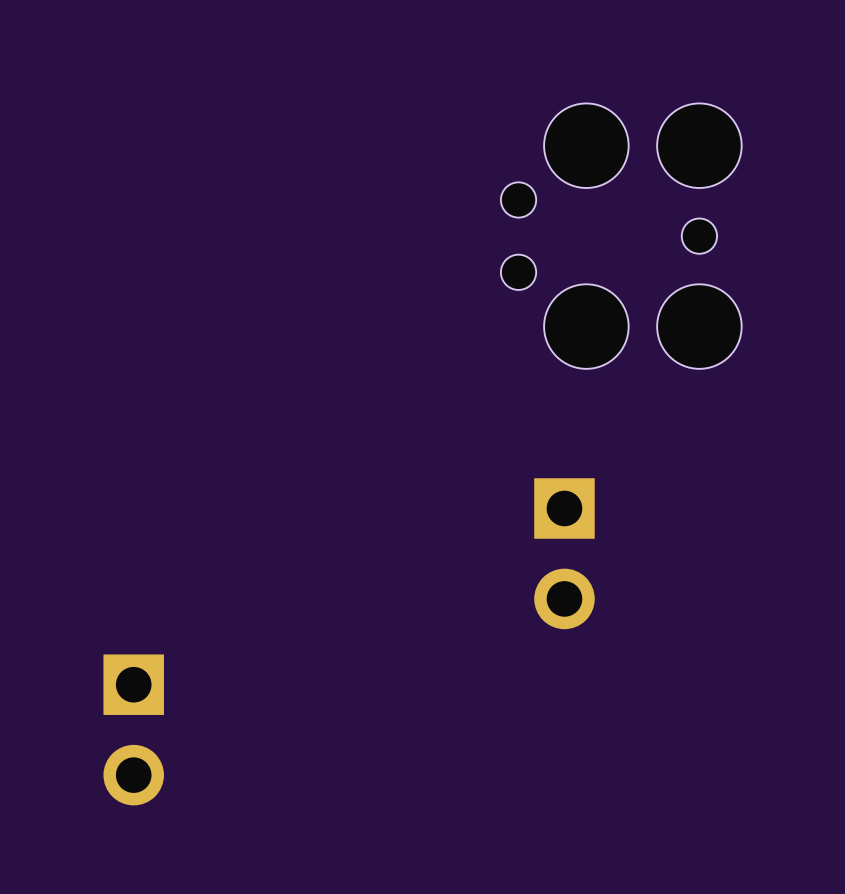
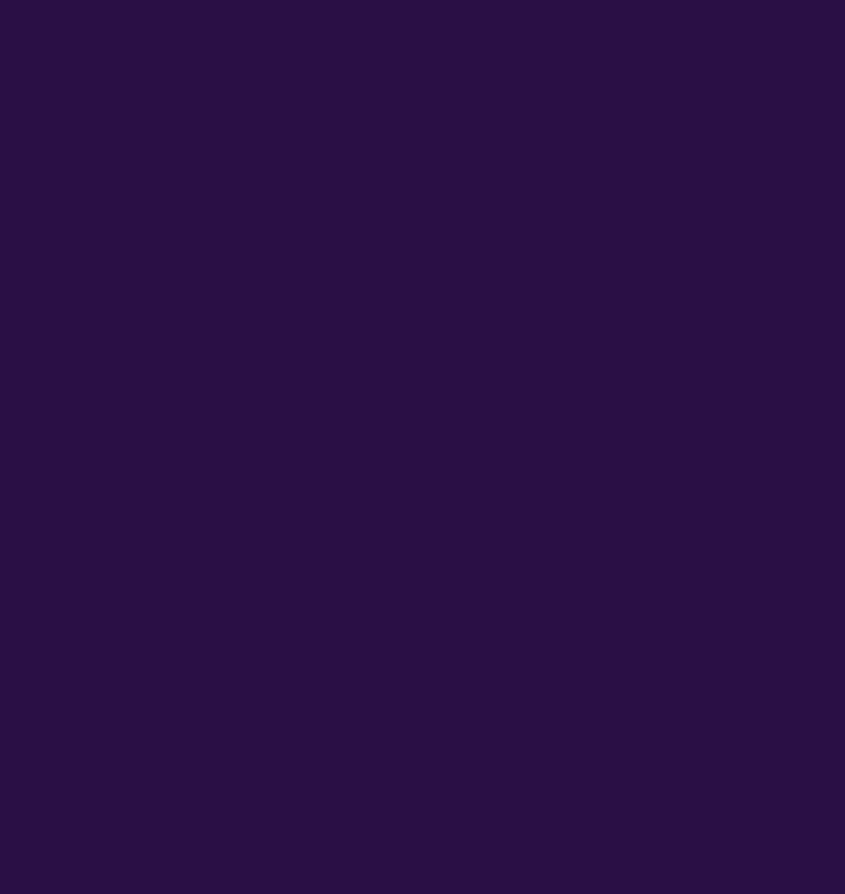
part: (621, 236) -> none
part: (564, 553) -> none
part: (133, 729) -> none

